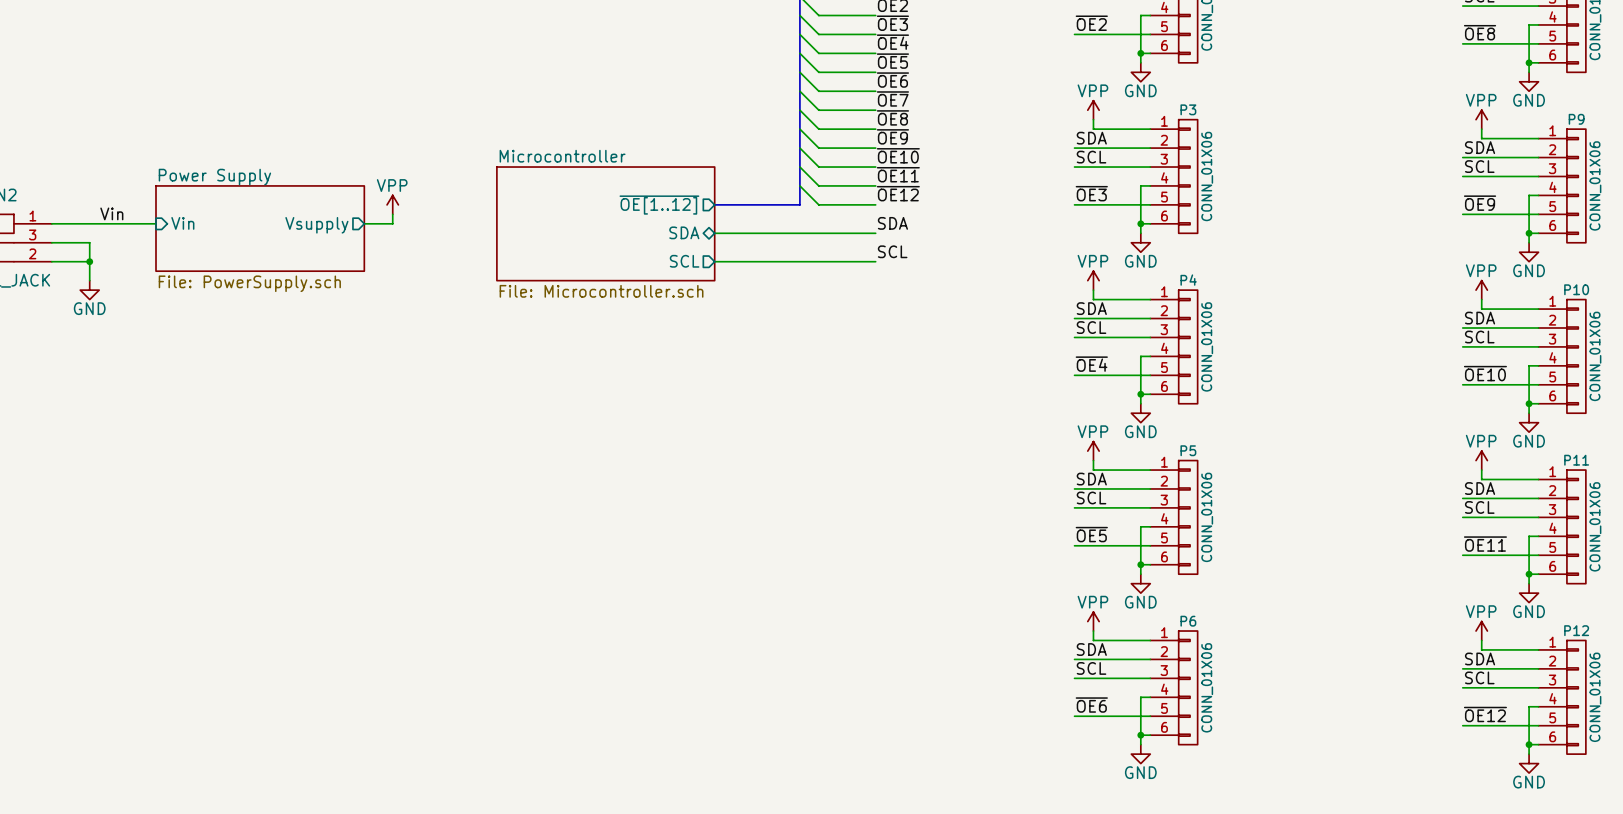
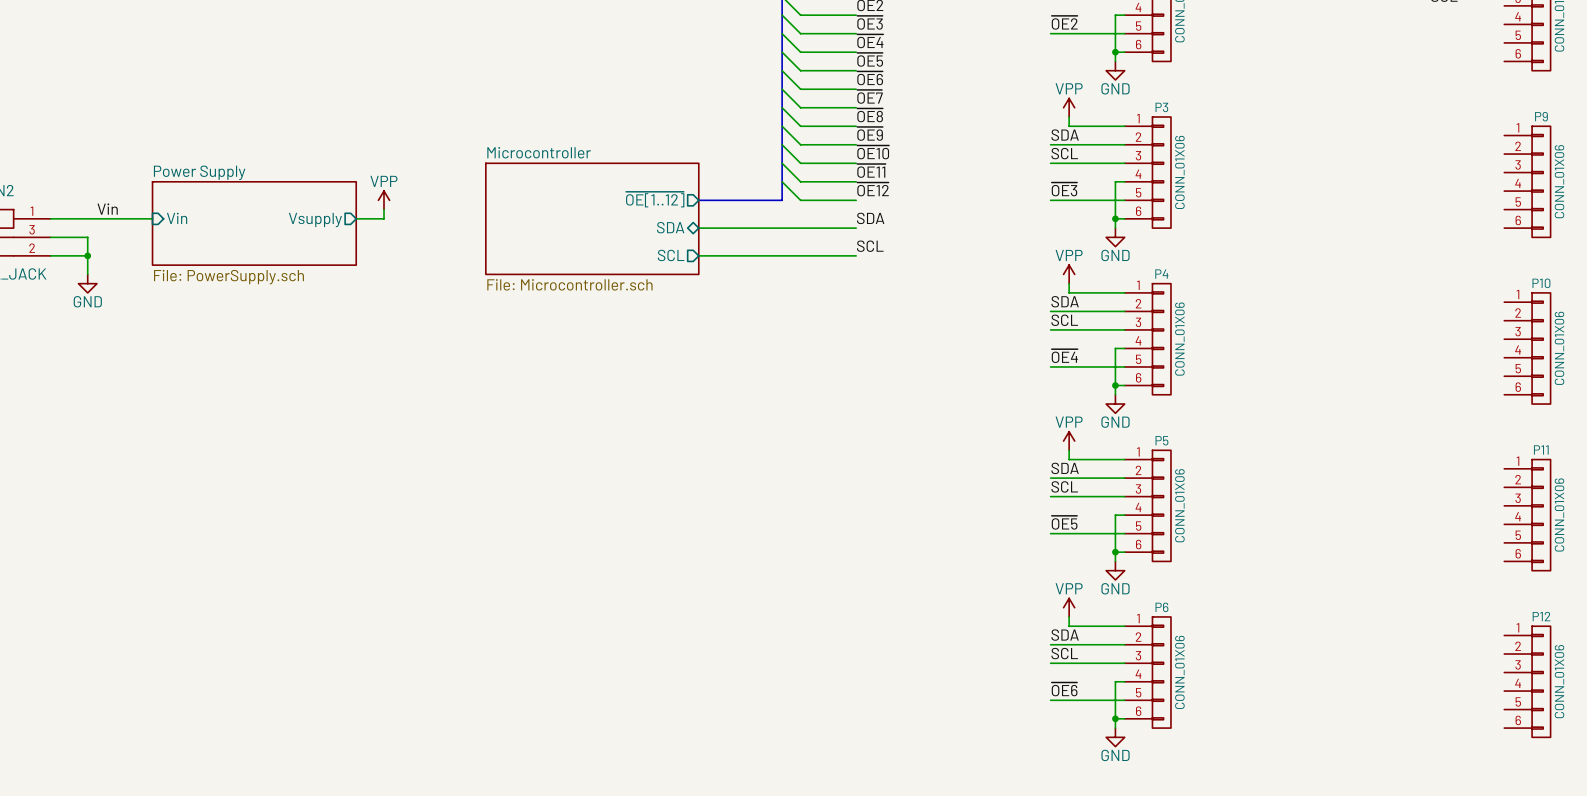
wire: (1462, 6) (1538, 6) -> none
wire: (1538, 24) (1529, 24) (1529, 72) -> none
label: ~{OE8} (1480, 32) -> none
wire: (1462, 43) (1538, 43) -> none
wire: (1529, 62) (1538, 62) -> none
junction: (1529, 62) -> none
power symbol: GND (1529, 81) -> none
power symbol: VPP (1481, 119) -> none
wire: (1481, 129) (1481, 138) (1538, 138) -> none
label: SDA (1480, 147) -> none
wire: (1462, 157) (1538, 157) -> none
label: SCL (1479, 166) -> none
wire: (1462, 176) (1538, 176) -> none
wire: (1538, 195) (1529, 195) (1529, 242) -> none
label: ~{OE9} (1480, 203) -> none
wire: (1462, 214) (1538, 214) -> none
wire: (1529, 233) (1538, 233) -> none
junction: (1529, 233) -> none
power symbol: GND (1529, 252) -> none
power symbol: VPP (1481, 290) -> none
wire: (1481, 299) (1481, 309) (1538, 309) -> none
label: SDA (1480, 318) -> none
wire: (1462, 327) (1538, 327) -> none
label: SCL (1479, 337) -> none
wire: (1462, 346) (1538, 346) -> none
wire: (1538, 365) (1529, 365) (1529, 413) -> none
label: ~{OE10} (1485, 373) -> none
wire: (1462, 384) (1538, 384) -> none
wire: (1529, 403) (1538, 403) -> none
junction: (1529, 403) -> none
power symbol: GND (1529, 422) -> none
power symbol: VPP (1481, 460) -> none
wire: (1481, 470) (1481, 479) (1538, 479) -> none
label: SDA (1480, 488) -> none
wire: (1462, 498) (1538, 498) -> none
label: SCL (1479, 507) -> none
wire: (1462, 517) (1538, 517) -> none
wire: (1538, 536) (1529, 536) (1529, 583) -> none
label: ~{OE11} (1485, 544) -> none
wire: (1462, 555) (1538, 555) -> none
wire: (1529, 574) (1538, 574) -> none
junction: (1529, 574) -> none
power symbol: GND (1529, 593) -> none
power symbol: VPP (1481, 631) -> none
wire: (1481, 640) (1481, 649) (1538, 649) -> none
label: SDA (1480, 658) -> none
wire: (1462, 668) (1538, 668) -> none
label: SCL (1479, 677) -> none
wire: (1462, 687) (1538, 687) -> none
wire: (1538, 706) (1529, 706) (1529, 754) -> none
label: ~{OE12} (1485, 714) -> none
wire: (1462, 725) (1538, 725) -> none
wire: (1529, 744) (1538, 744) -> none
junction: (1529, 744) -> none
power symbol: GND (1529, 763) -> none

